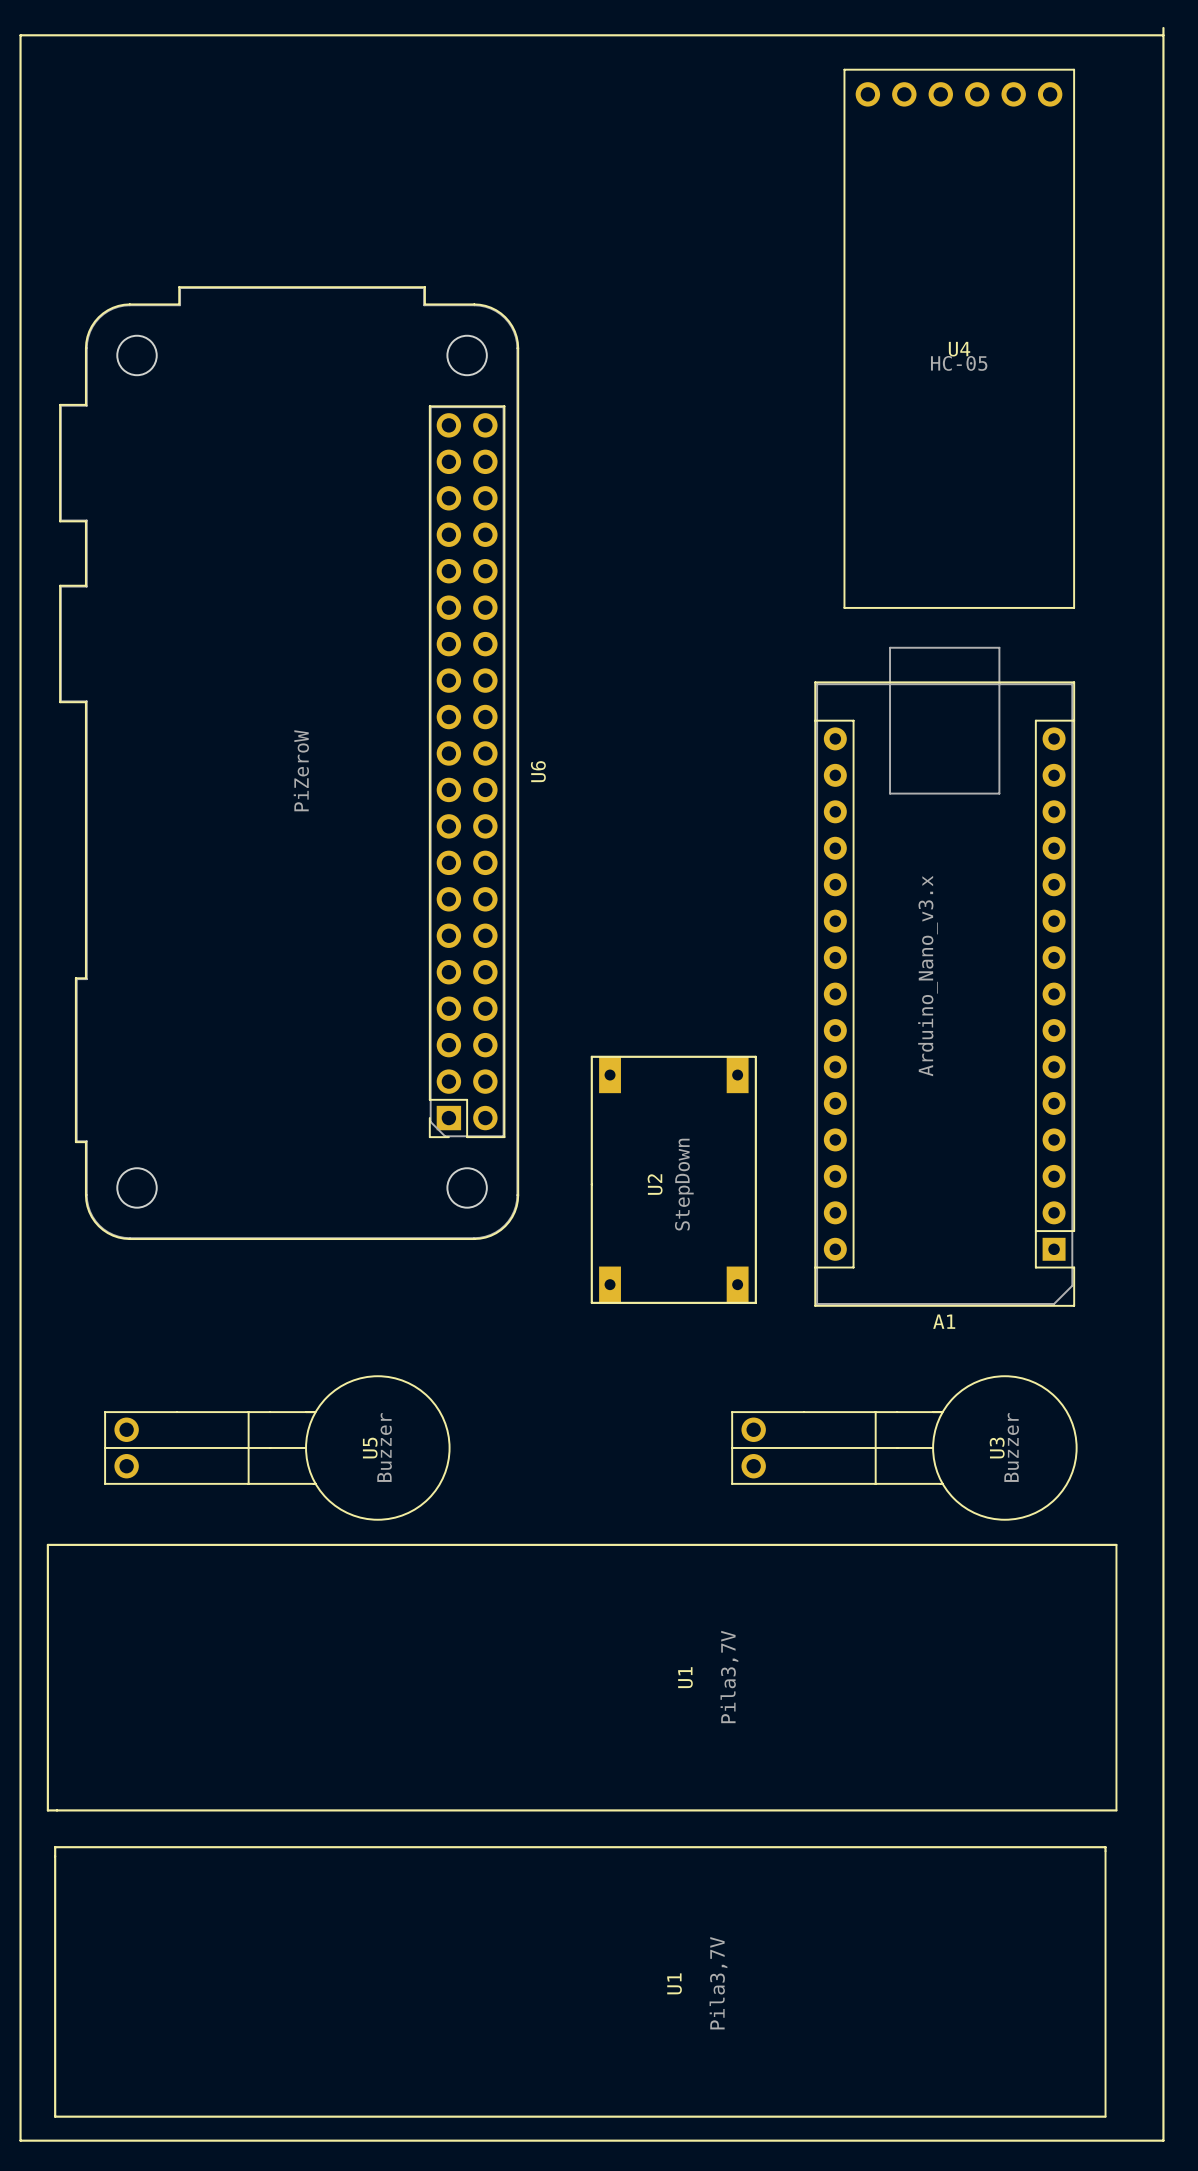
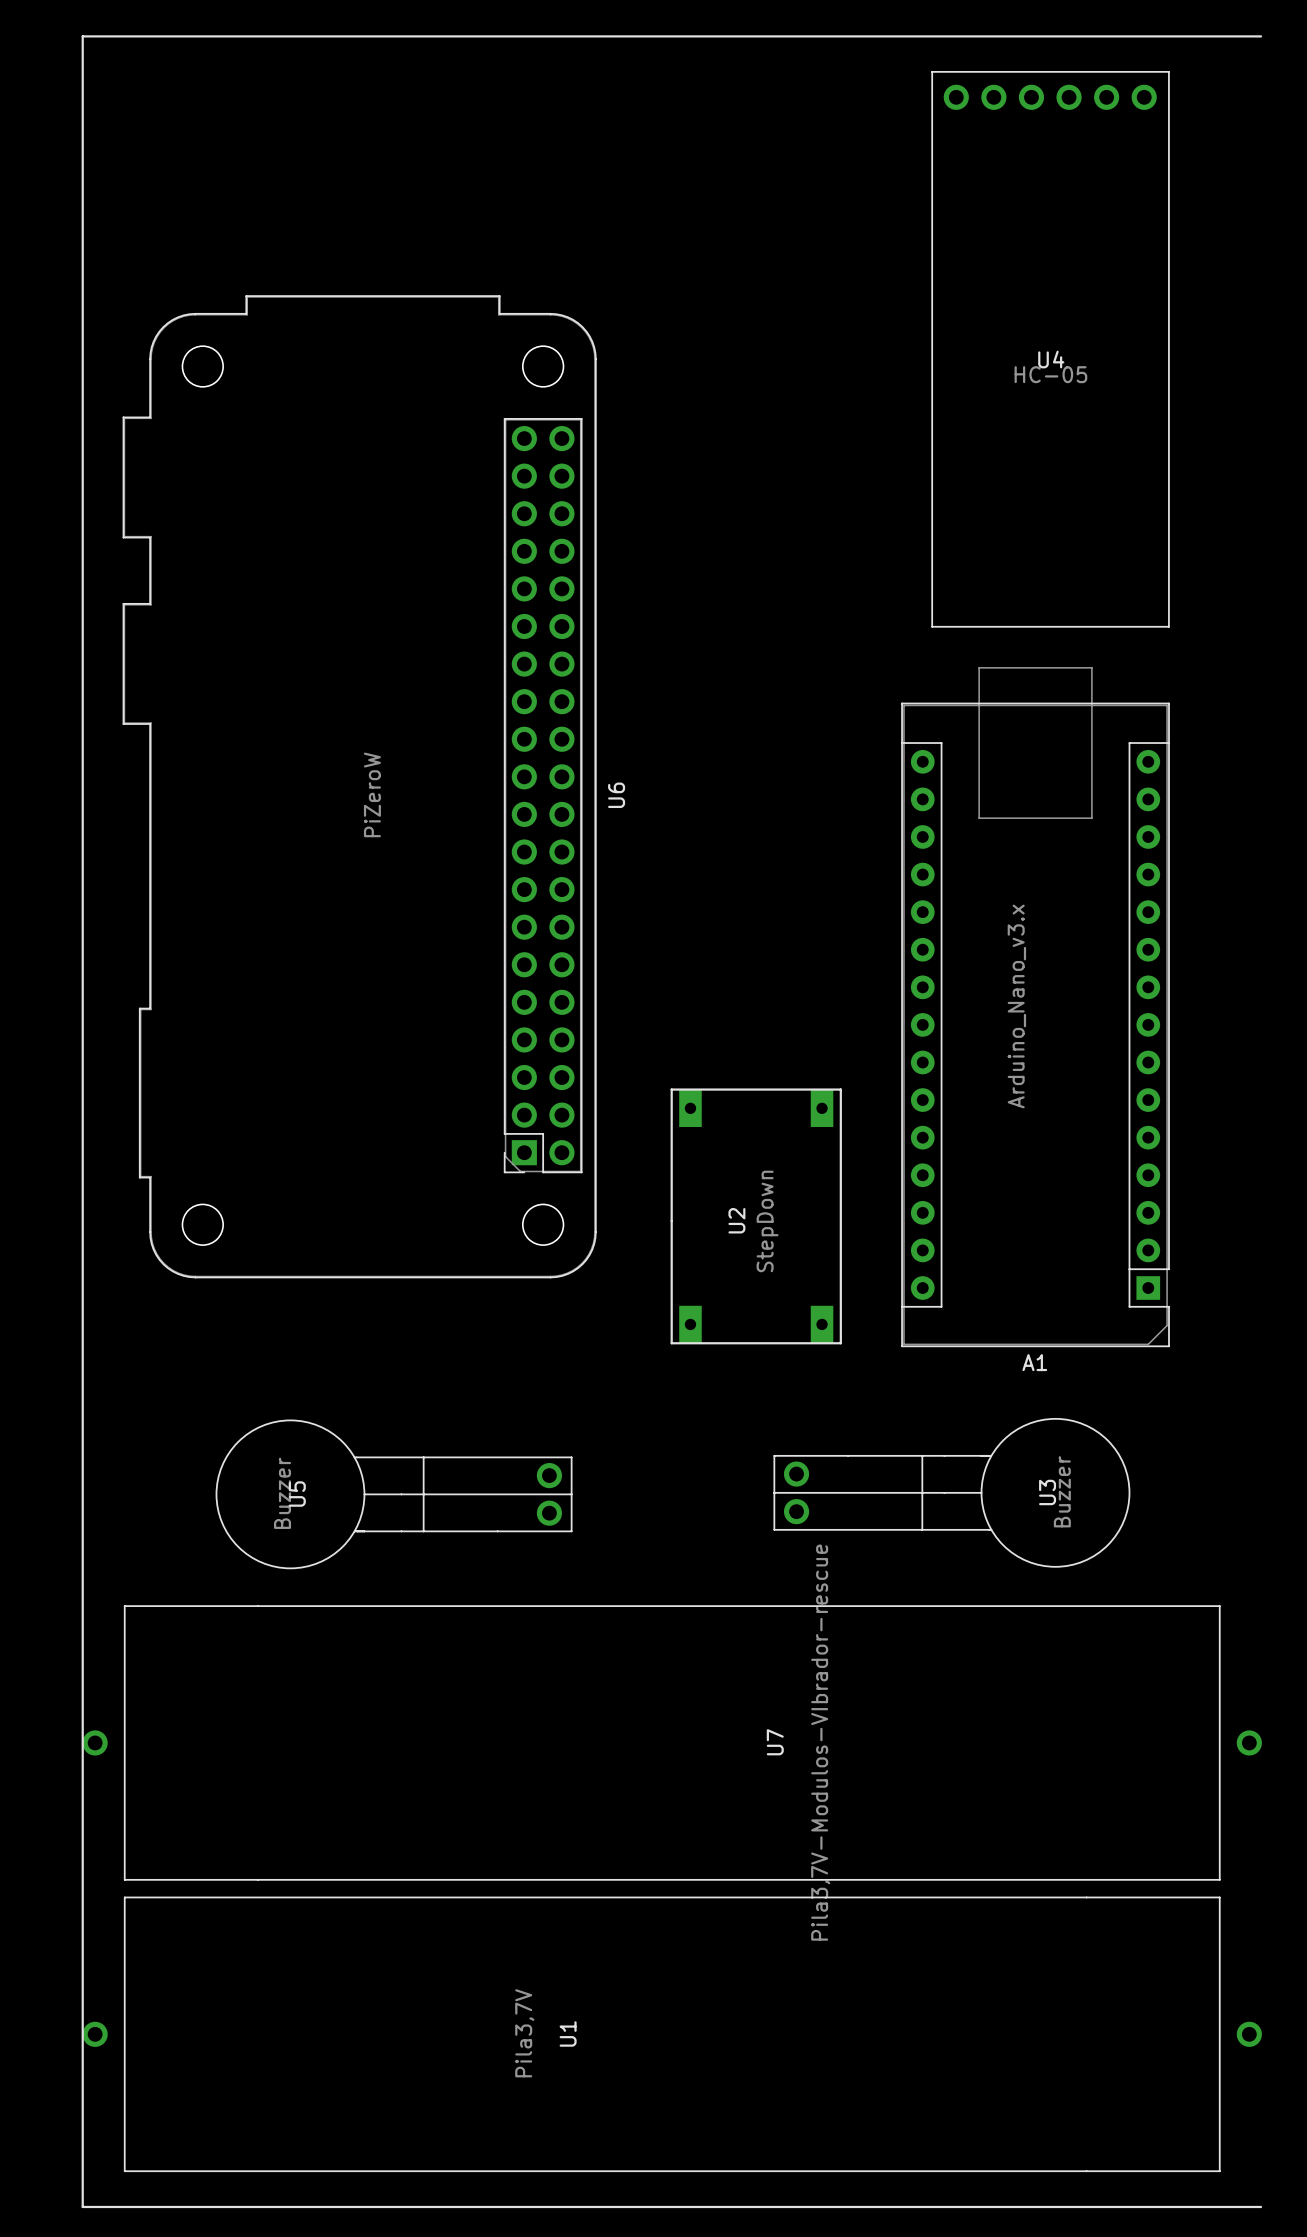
line: (1163, 28) (1163, 2140) -> none
U5 rotation: 0° (277, 1447) -> 180° (394, 1494)
U3 position: (904, 1447) -> (951, 1492)
U1: Pila3,7V (582, 1677) -> none
U7: none -> Pila3,7V-Modulos-VIbrador-rescue (672, 1742)
U1: none -> Pila3,7V (672, 2034)
U1: Pila3,7V (580, 1981) -> none

